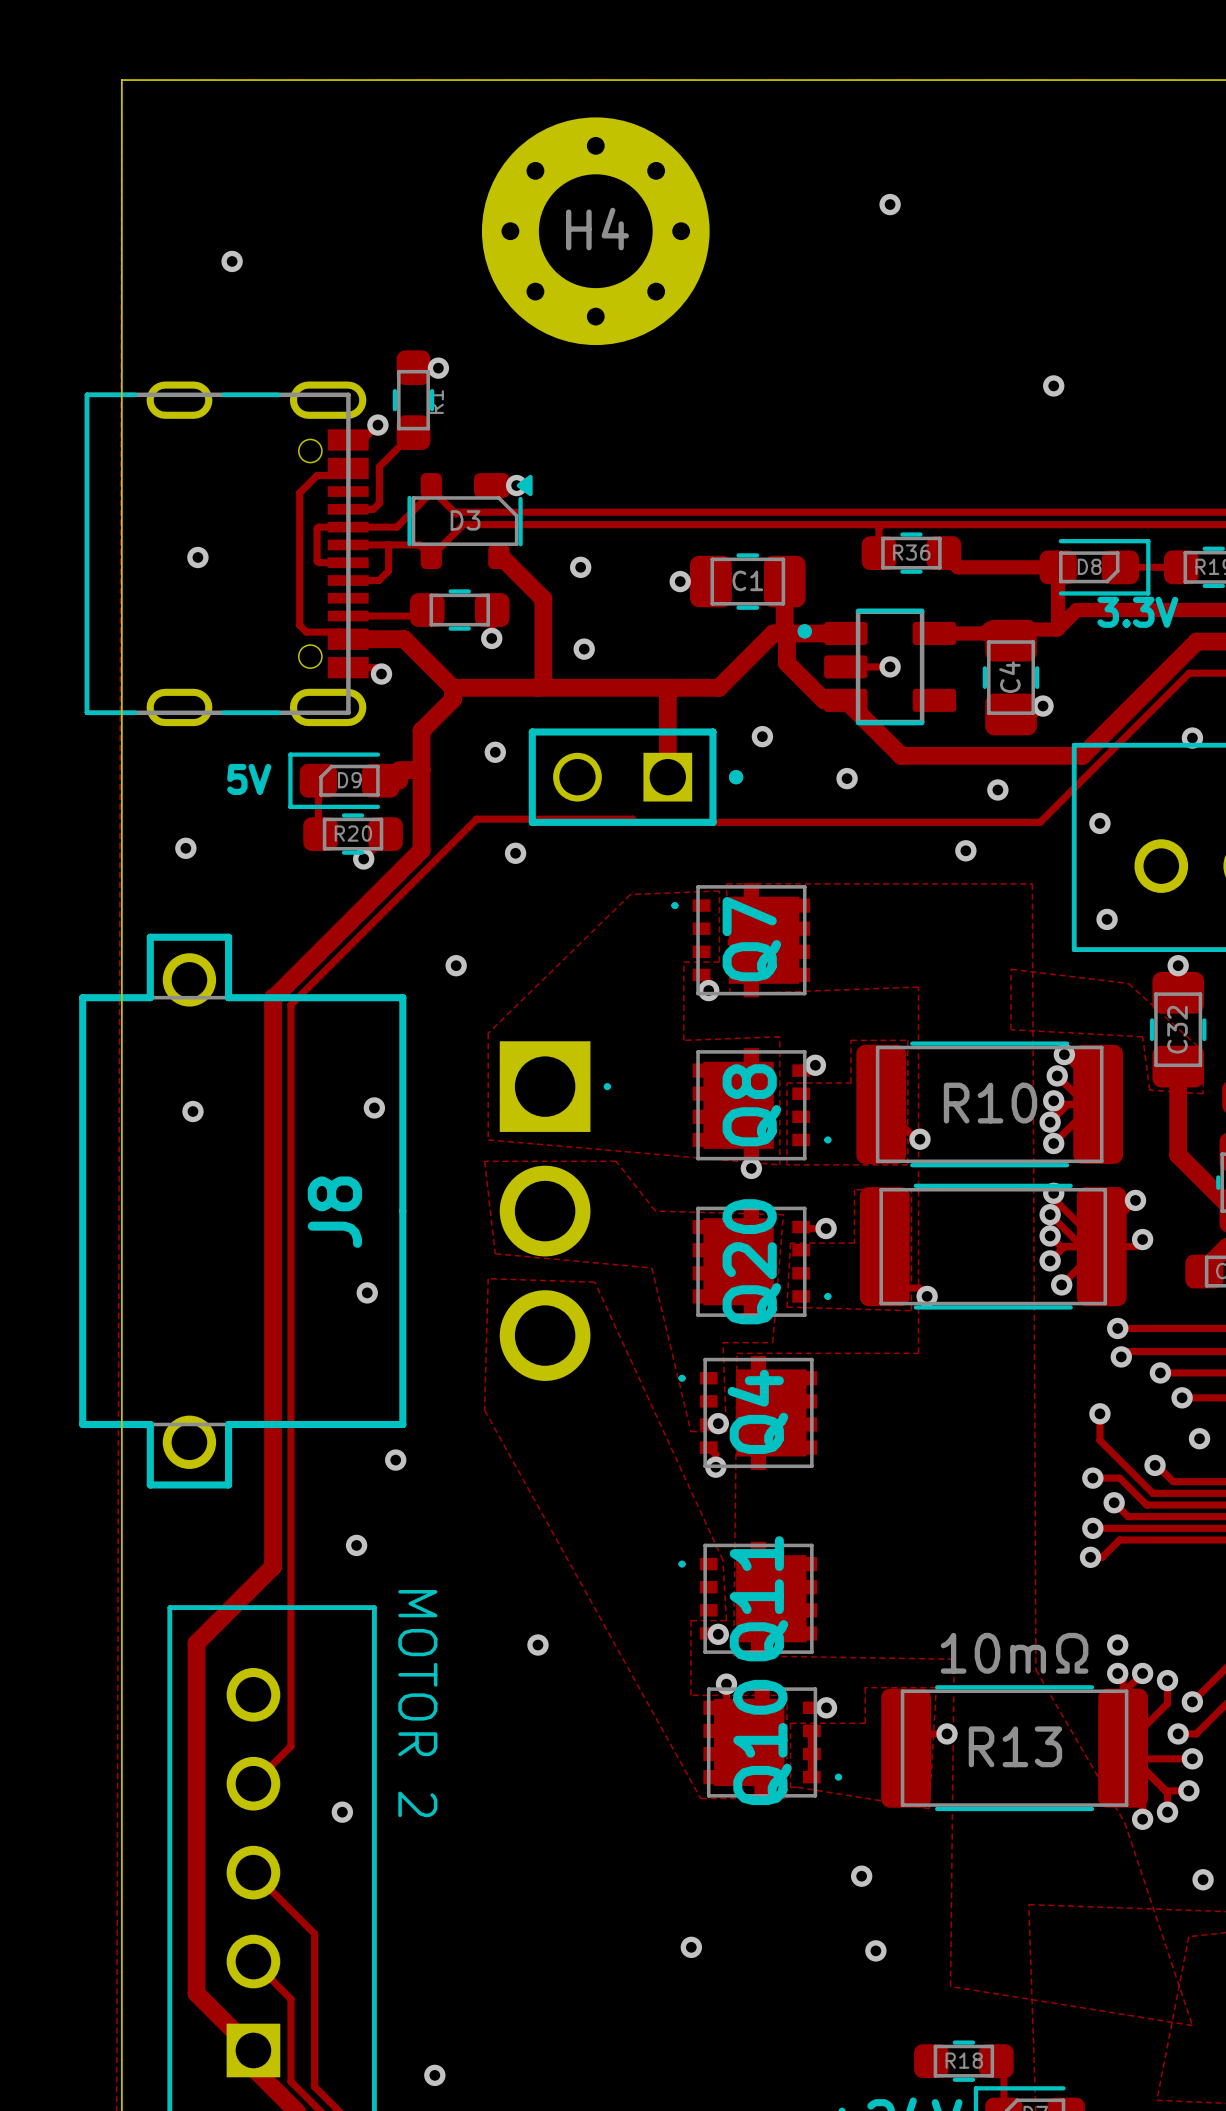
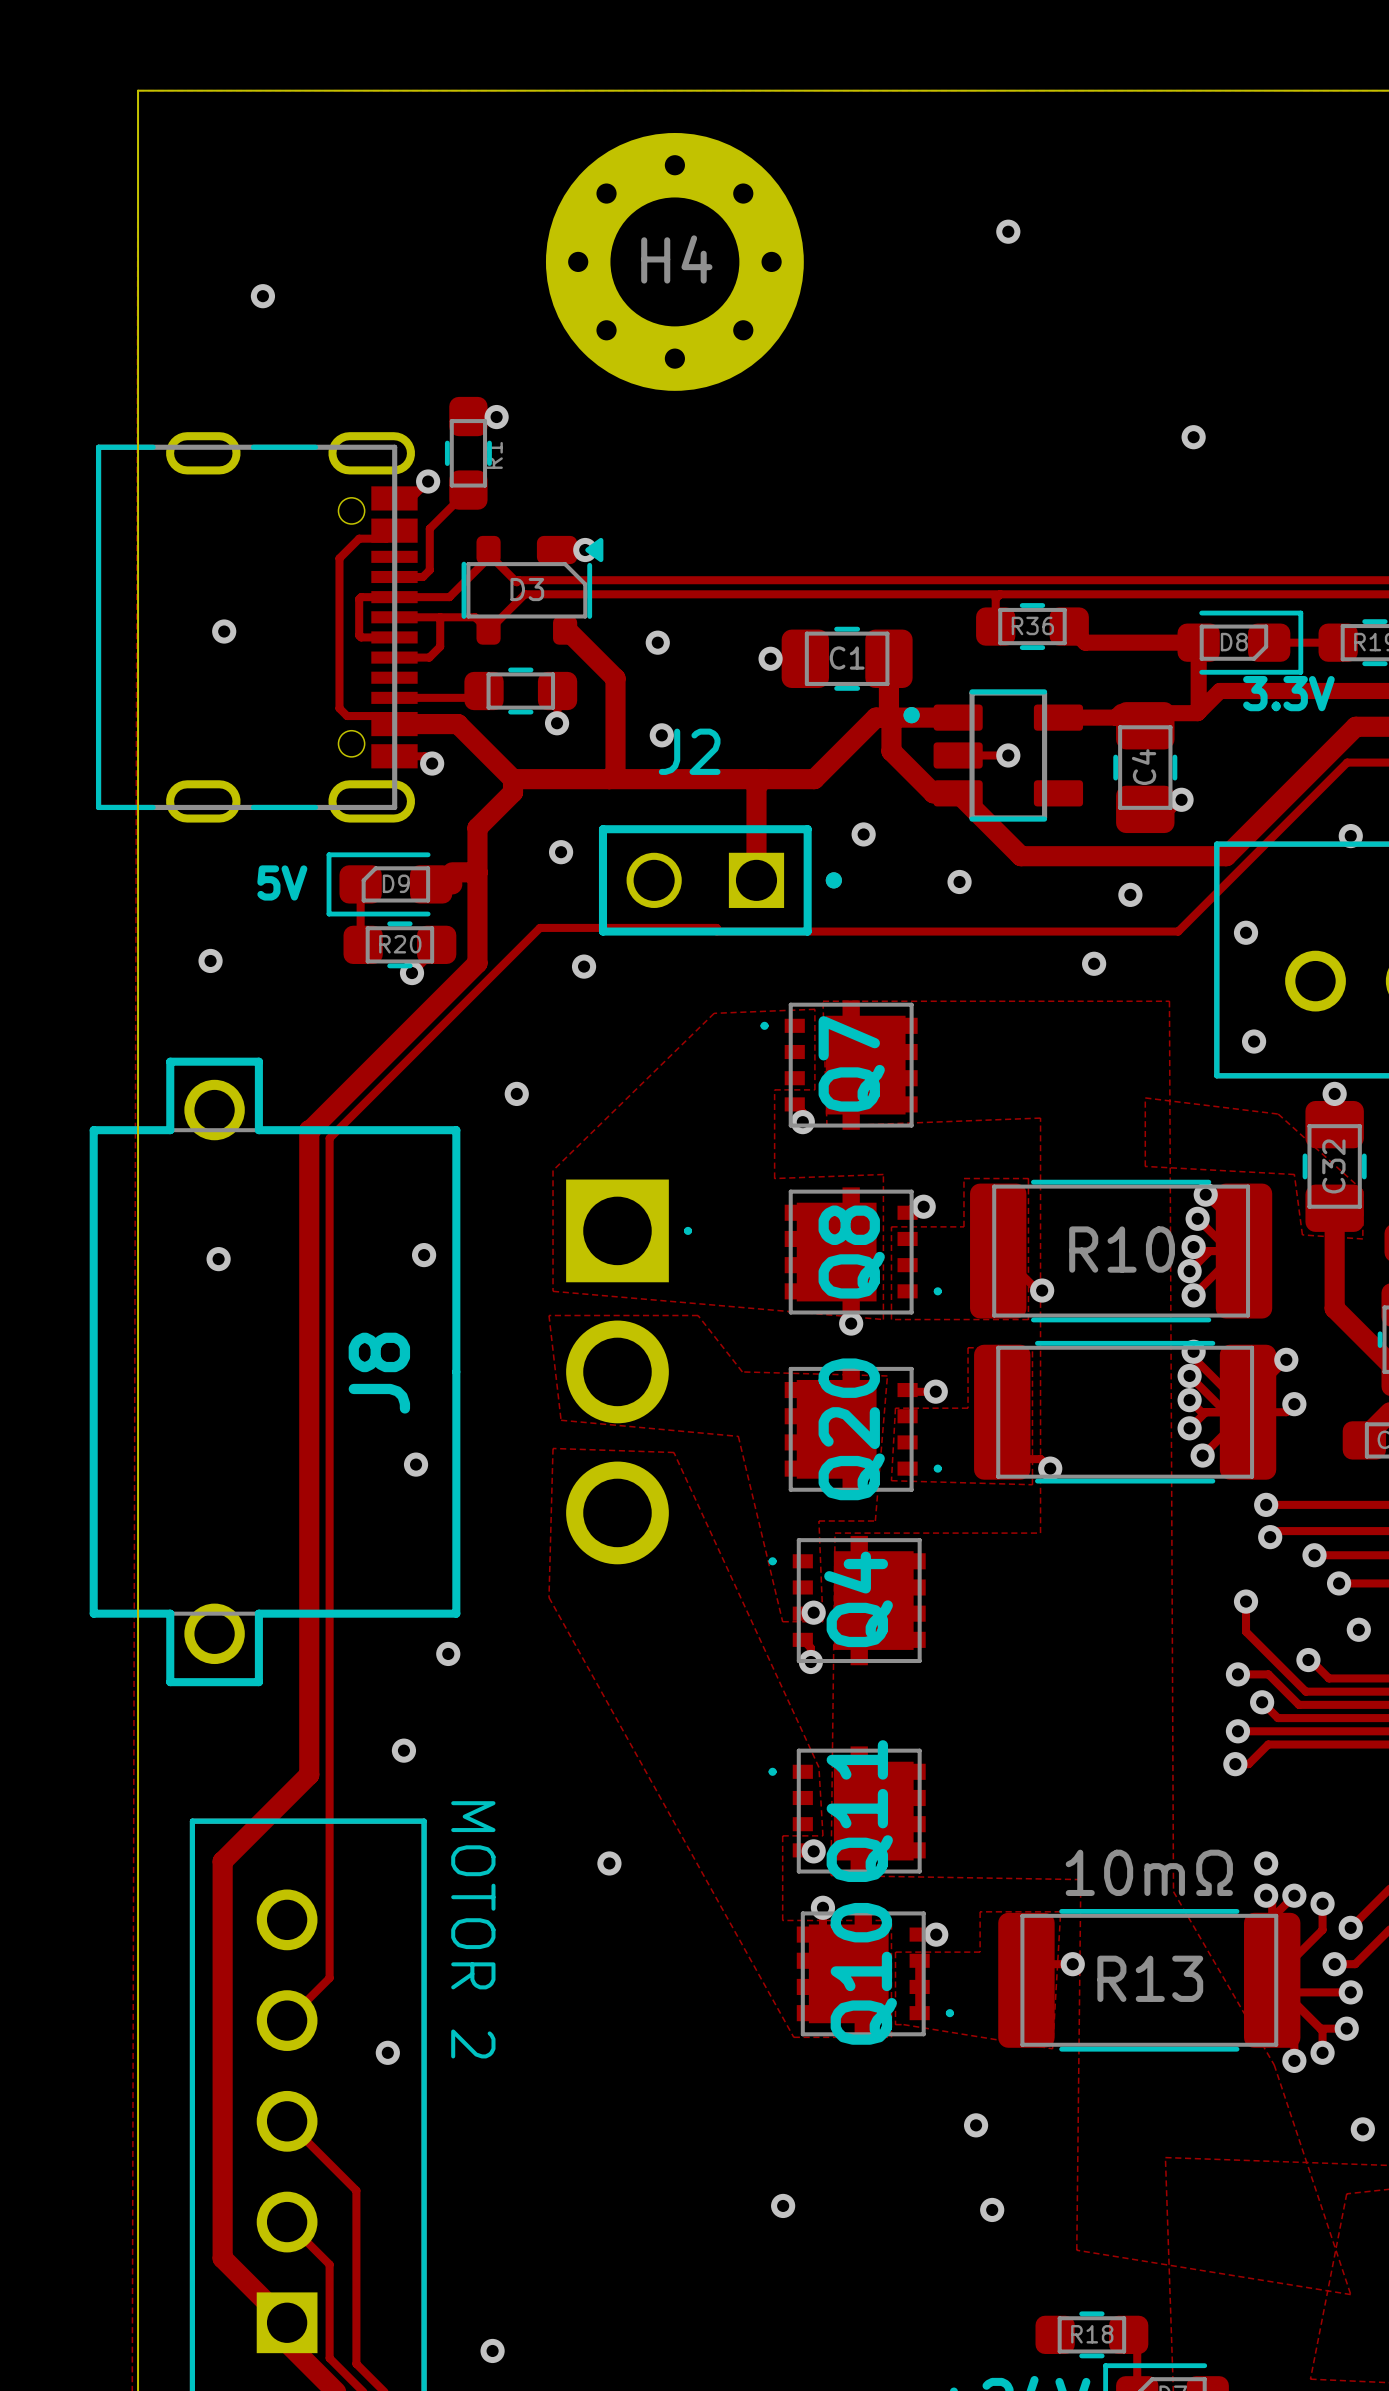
J2 name: none -> J2 (689, 751)

